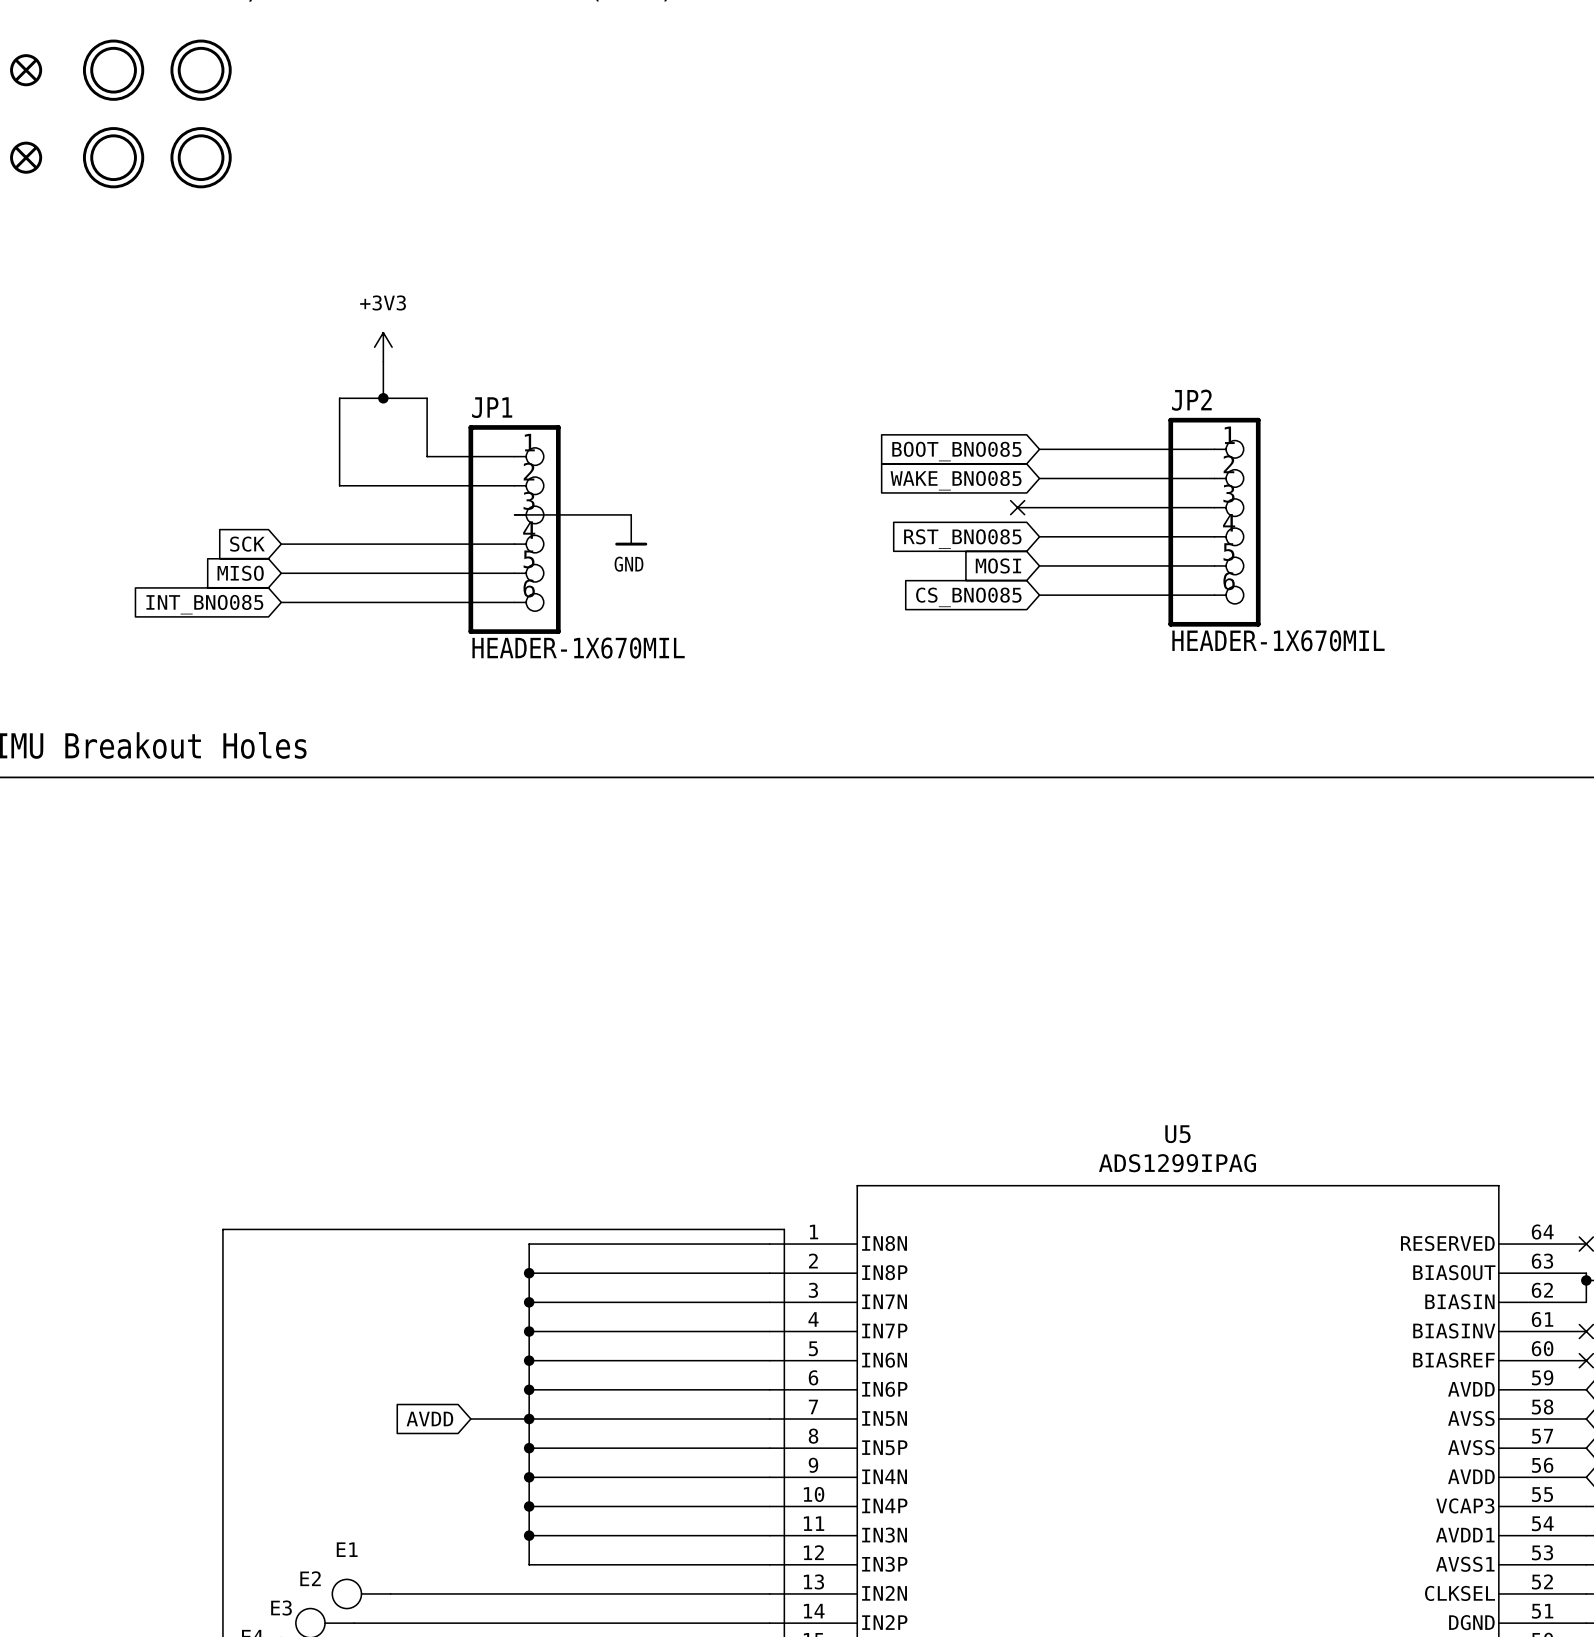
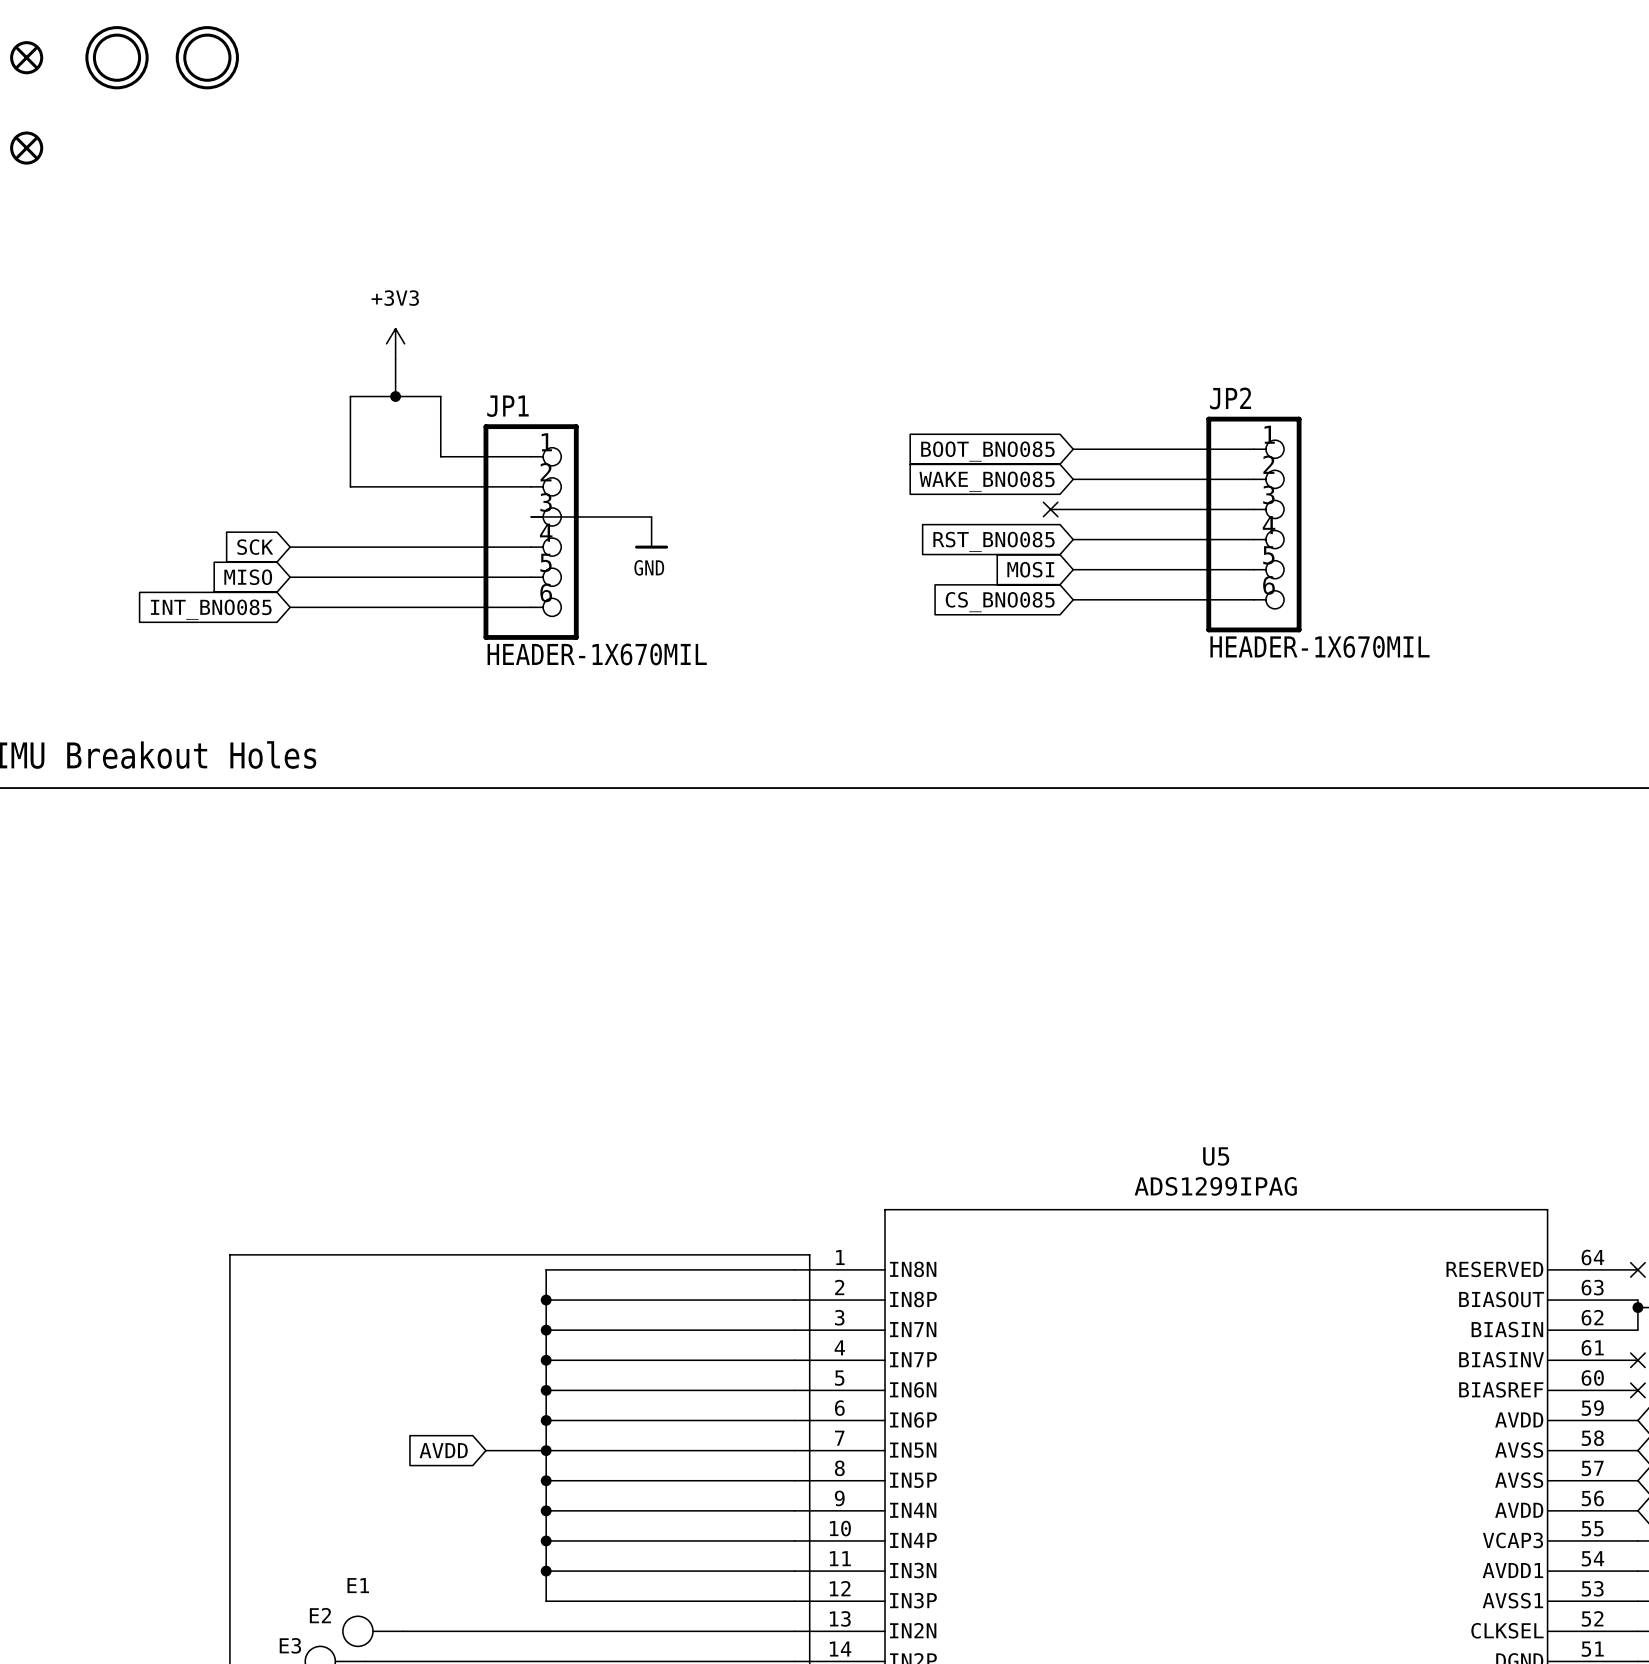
part: (113, 157) -> none
part: (201, 157) -> none

